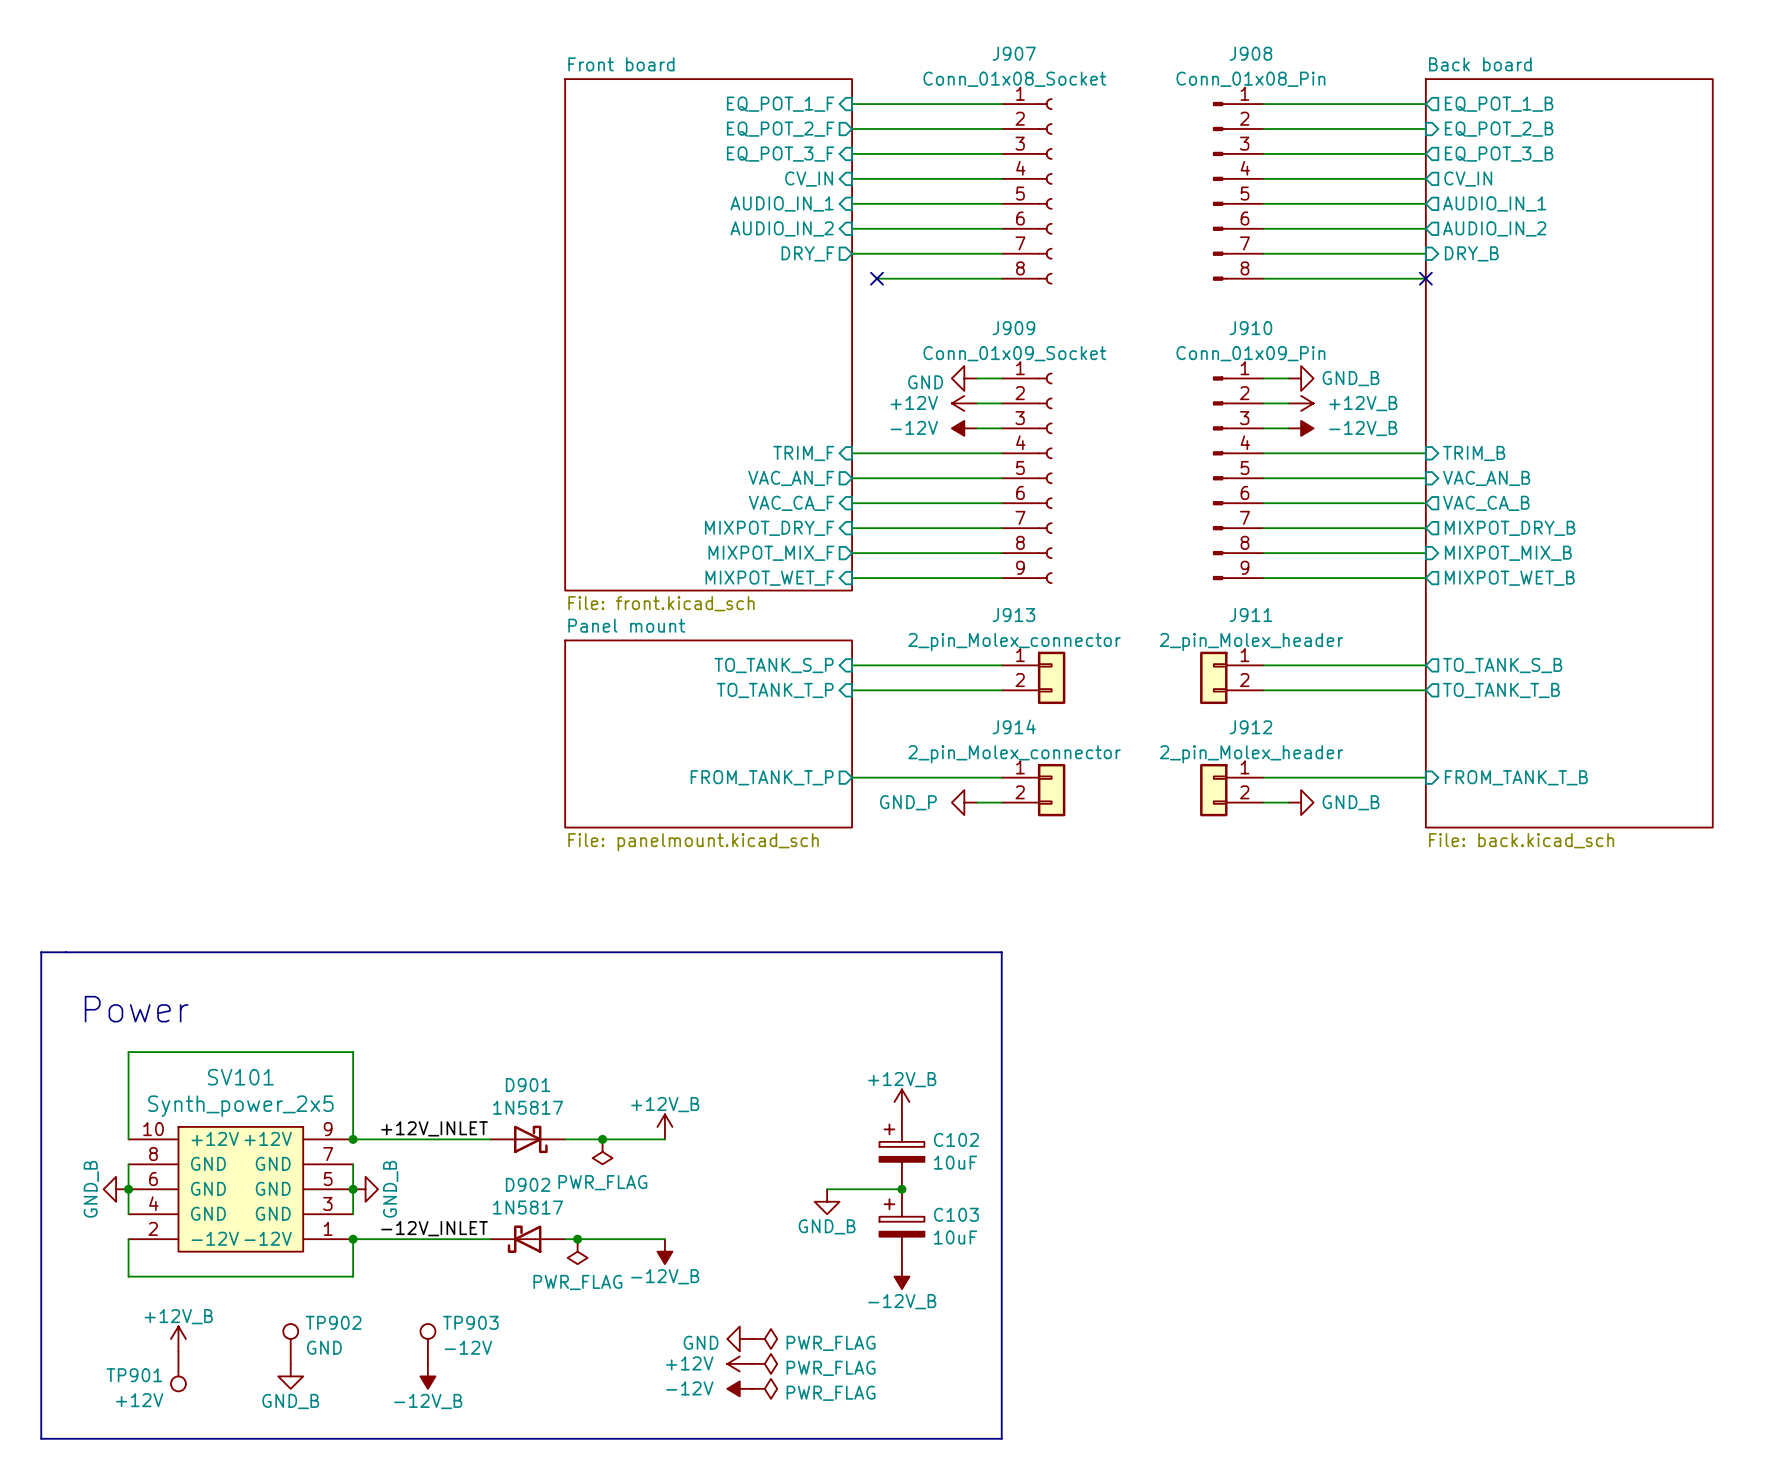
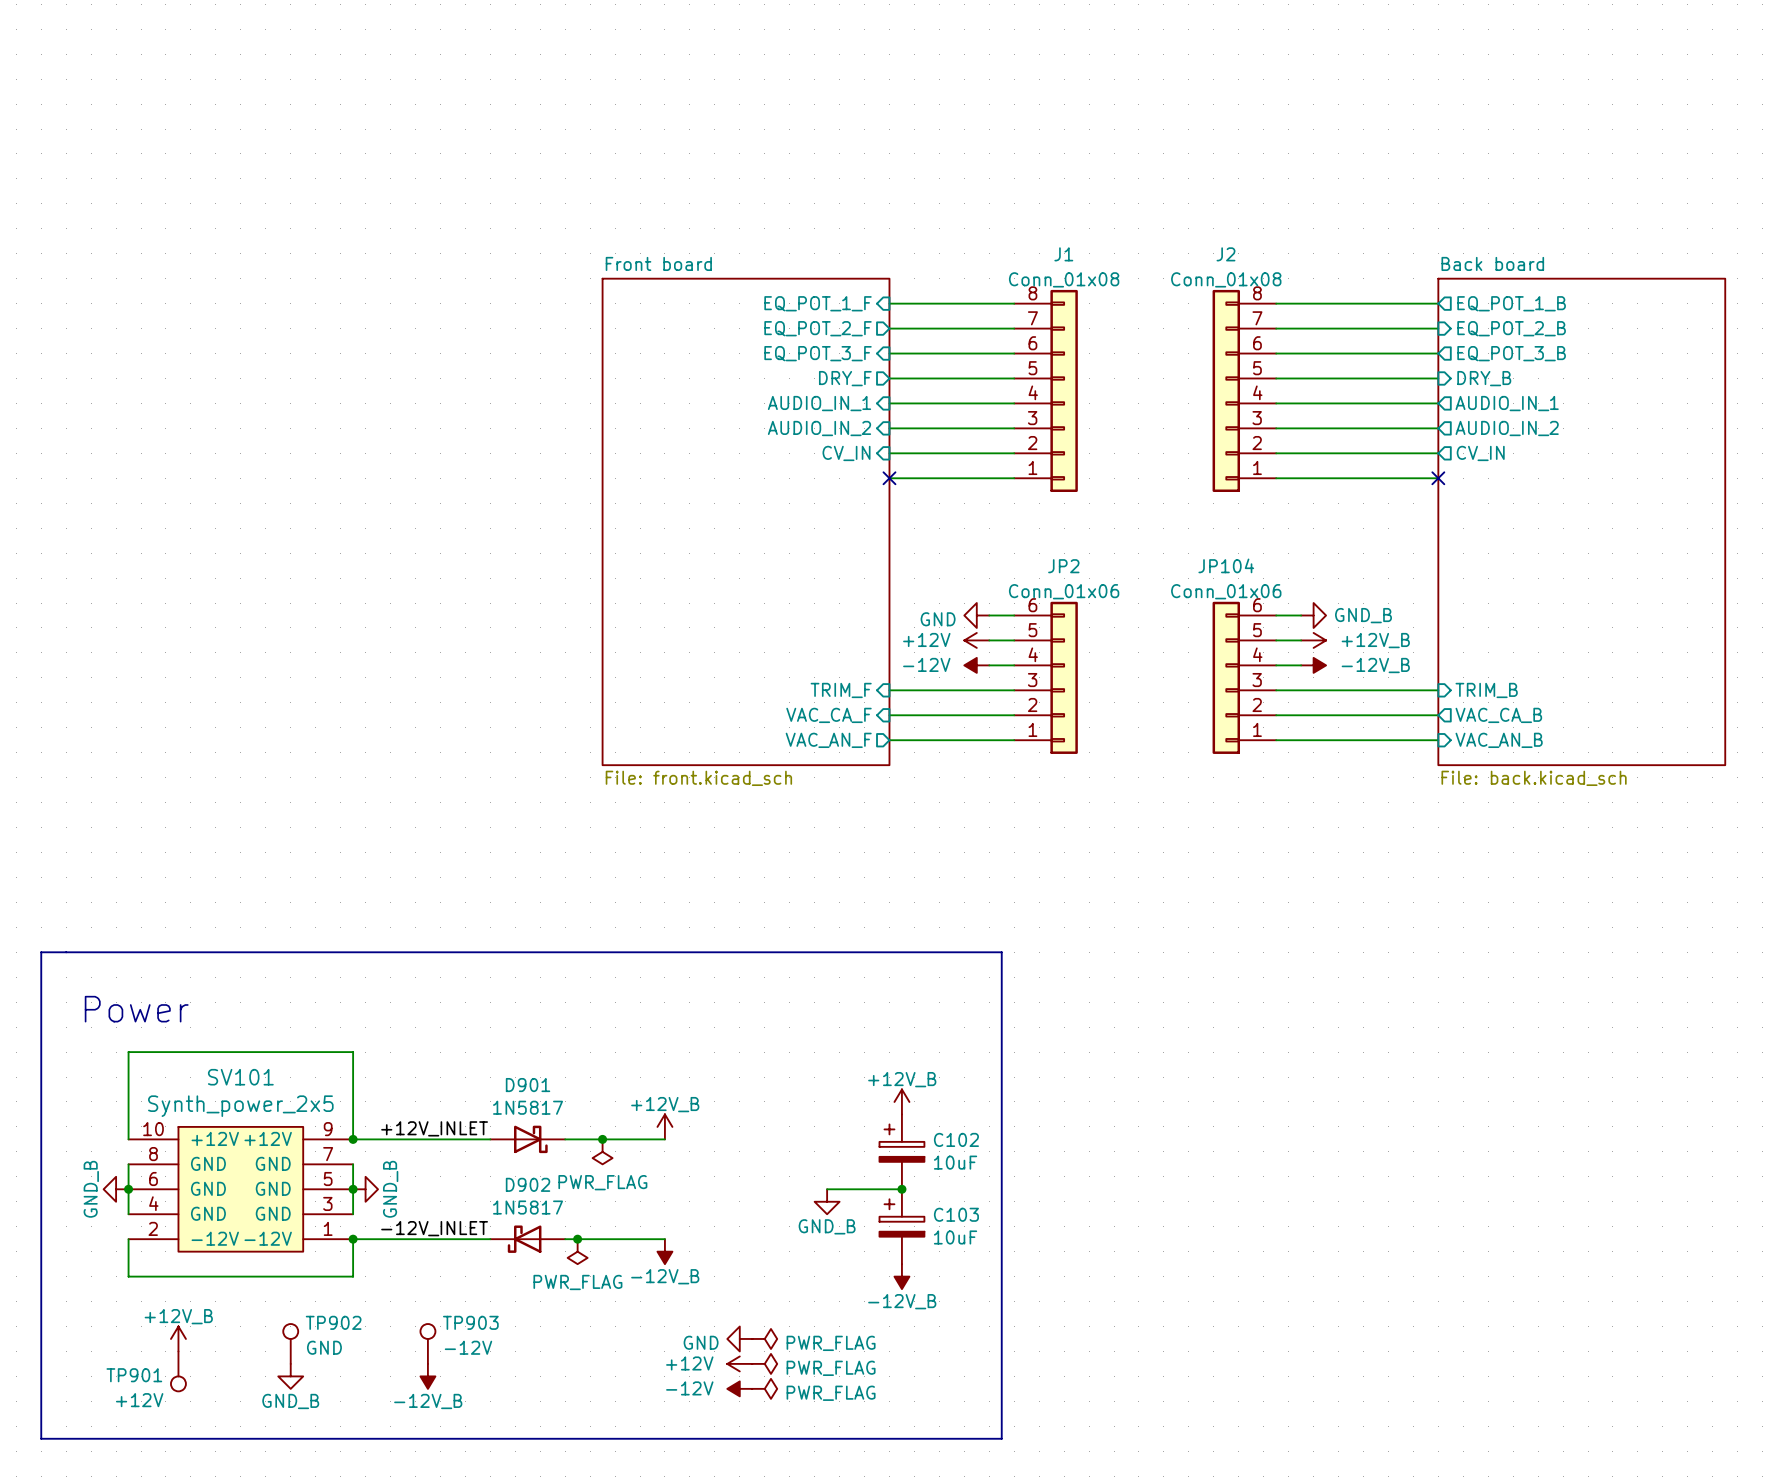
sheet pin position: EQ_POT_1_F (780, 104) -> EQ_POT_1_F (818, 303)
wire: (852, 104) (1001, 104) -> none
wire: (1263, 104) (1425, 104) -> none
sheet pin position: EQ_POT_1_B (1499, 104) -> EQ_POT_1_B (1511, 303)
sheet pin position: EQ_POT_2_F (780, 129) -> EQ_POT_2_F (818, 328)
wire: (852, 129) (1001, 129) -> none
wire: (1263, 129) (1425, 129) -> none
sheet pin position: EQ_POT_2_B (1499, 129) -> EQ_POT_2_B (1511, 328)
wire: (852, 153) (1001, 153) -> none
wire: (1263, 153) (1425, 153) -> none
sheet pin position: EQ_POT_3_F (780, 154) -> EQ_POT_3_F (818, 353)
sheet pin position: EQ_POT_3_B (1499, 154) -> EQ_POT_3_B (1511, 353)
wire: (852, 178) (1001, 178) -> none
wire: (1263, 178) (1425, 178) -> none
sheet pin: CV_IN (809, 179) -> none
sheet pin: CV_IN (1468, 179) -> none
J907: Conn_01x08_Socket (1027, 191) -> none
J908: Conn_01x08_Pin (1238, 191) -> none
sheet pin position: AUDIO_IN_1 (782, 203) -> AUDIO_IN_1 (819, 403)
wire: (852, 203) (1001, 203) -> none
wire: (1263, 203) (1425, 203) -> none
sheet pin position: AUDIO_IN_1 (1494, 203) -> AUDIO_IN_1 (1507, 403)
sheet pin position: AUDIO_IN_2 (782, 228) -> AUDIO_IN_2 (819, 428)
wire: (852, 228) (1001, 228) -> none
wire: (1263, 228) (1425, 228) -> (1276, 303) (1438, 303)
sheet pin position: AUDIO_IN_2 (1494, 228) -> AUDIO_IN_2 (1507, 428)
sheet pin position: DRY_F (807, 253) -> DRY_F (845, 378)
wire: (852, 253) (1001, 253) -> none
wire: (1263, 253) (1425, 253) -> (1276, 328) (1438, 328)
sheet pin position: DRY_B (1471, 253) -> DRY_B (1484, 378)
wire: (877, 278) (1001, 278) -> (889, 353) (1014, 353)
no-connect mark: (877, 278) -> none
wire: (1263, 278) (1425, 278) -> (1276, 353) (1438, 353)
no-connect mark: (1425, 278) -> none
wire: none -> (889, 303) (1014, 303)
wire: none -> (889, 328) (1014, 328)
sheet Front board: File: front.kicad_sch (708, 334) -> none
wire: none -> (889, 378) (976, 378)
power symbol position: GND (964, 378) -> GND (976, 615)
wire: none -> (1288, 378) (1438, 378)
power symbol: GND_B (1301, 378) -> none
J1: none -> Conn_01x08 (1046, 390)
J2: none -> Conn_01x08 (1244, 390)
wire: none -> (889, 403) (976, 403)
power symbol position: +12V (964, 403) -> +12V (976, 640)
wire: none -> (1288, 403) (1438, 403)
power symbol position: +12V_B (1301, 403) -> +12V_B (1313, 640)
wire: none -> (889, 428) (976, 428)
power symbol position: -12V (964, 428) -> -12V (976, 665)
wire: none -> (1288, 428) (1438, 428)
power symbol position: -12V_B (1301, 428) -> -12V_B (1313, 665)
sheet pin position: TRIM_F (803, 453) -> TRIM_F (841, 690)
sheet pin: none -> CV_IN (846, 453)
wire: (852, 453) (889, 453) -> none
sheet pin position: TRIM_B (1474, 453) -> TRIM_B (1486, 690)
sheet pin: none -> CV_IN (1480, 453)
sheet Back board: File: back.kicad_sch (1569, 453) -> none
sheet pin: VAC_AN_F (791, 478) -> none
wire: (852, 478) (889, 478) -> none
no-connect mark: none -> (889, 478)
J909: Conn_01x09_Socket (1027, 478) -> none
J910: Conn_01x09_Pin (1238, 478) -> none
no-connect mark: none -> (1438, 478)
sheet pin: VAC_AN_B (1486, 478) -> none
sheet pin position: VAC_CA_F (791, 503) -> VAC_CA_F (828, 715)
wire: (852, 503) (1001, 503) -> none
wire: (1263, 503) (1425, 503) -> none
sheet pin position: VAC_CA_B (1486, 503) -> VAC_CA_B (1498, 715)
sheet Front board: none -> File: front.kicad_sch (746, 521)
sheet Back board: none -> File: back.kicad_sch (1581, 521)
sheet pin: MIXPOT_DRY_F (769, 528) -> none
wire: (852, 528) (1001, 528) -> none
wire: (1263, 528) (1425, 528) -> none
sheet pin: MIXPOT_DRY_B (1510, 528) -> none
sheet pin: MIXPOT_MIX_F (771, 553) -> none
wire: (852, 553) (1001, 553) -> none
wire: (1263, 553) (1425, 553) -> (1276, 715) (1438, 715)
sheet pin: MIXPOT_MIX_B (1508, 553) -> none
sheet pin: MIXPOT_WET_F (769, 578) -> none
wire: (852, 578) (1001, 578) -> none
wire: (1263, 578) (1425, 578) -> (1276, 740) (1438, 740)
sheet pin: MIXPOT_WET_B (1509, 578) -> none
wire: none -> (989, 615) (1014, 615)
wire: none -> (1276, 615) (1301, 615)
power symbol: none -> GND_B (1313, 615)
sheet pin: TO_TANK_S_P (774, 665) -> none
wire: (852, 665) (989, 665) -> none
wire: (1301, 665) (1425, 665) -> none
sheet pin: TO_TANK_S_B (1502, 665) -> none
J913: 2_pin_Molex_connector (1033, 677) -> none
JP2: none -> Conn_01x06 (1046, 677)
J911: 2_pin_Molex_header (1231, 677) -> none
JP104: none -> Conn_01x06 (1244, 677)
sheet pin: TO_TANK_T_P (775, 690) -> none
wire: (852, 690) (889, 690) -> none
sheet pin: TO_TANK_T_B (1501, 690) -> none
wire: none -> (889, 715) (1014, 715)
sheet Panel mount: File: panelmount.kicad_sch (708, 733) -> none
sheet pin: none -> VAC_AN_F (828, 740)
wire: none -> (889, 740) (1014, 740)
sheet pin: none -> VAC_AN_B (1499, 740)
sheet pin: FROM_TANK_T_P (762, 777) -> none
wire: (852, 777) (1001, 777) -> none
wire: (1263, 777) (1425, 777) -> none
sheet pin: FROM_TANK_T_B (1516, 777) -> none
J914: 2_pin_Molex_connector (1033, 790) -> none
J912: 2_pin_Molex_header (1231, 790) -> none
power symbol: GND_P (964, 802) -> none
wire: (976, 802) (1001, 802) -> (989, 640) (1014, 640)
wire: (1263, 802) (1288, 802) -> (1276, 640) (1301, 640)
power symbol: GND_B (1301, 802) -> none

